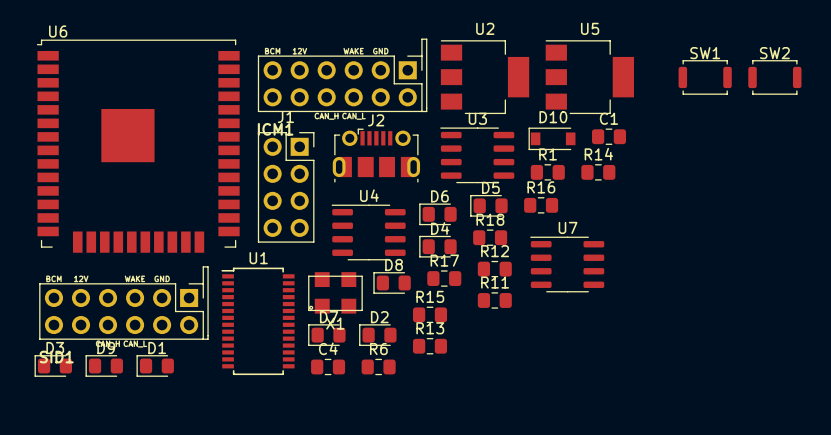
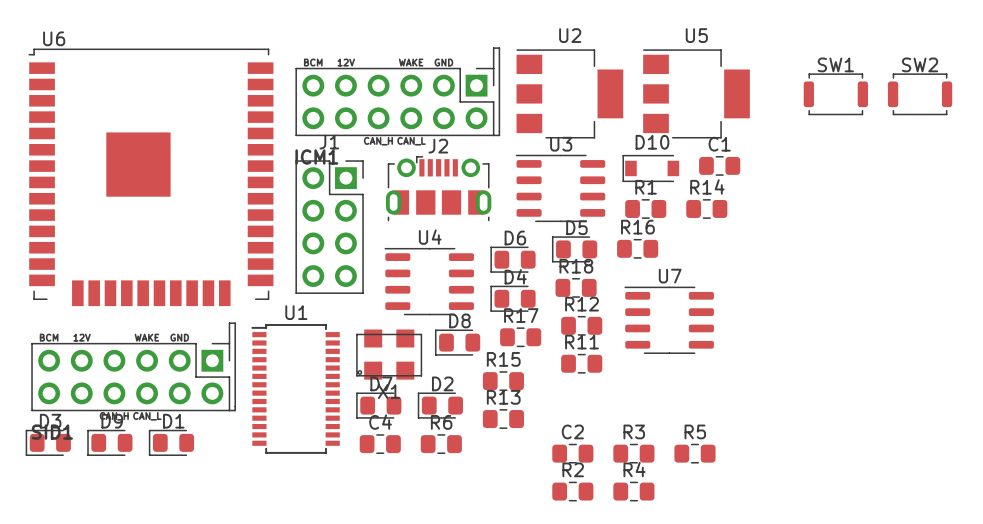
C2: none -> (572, 453)
R3: none -> (633, 453)
R5: none -> (694, 453)
R2: none -> (572, 491)
R4: none -> (633, 491)

